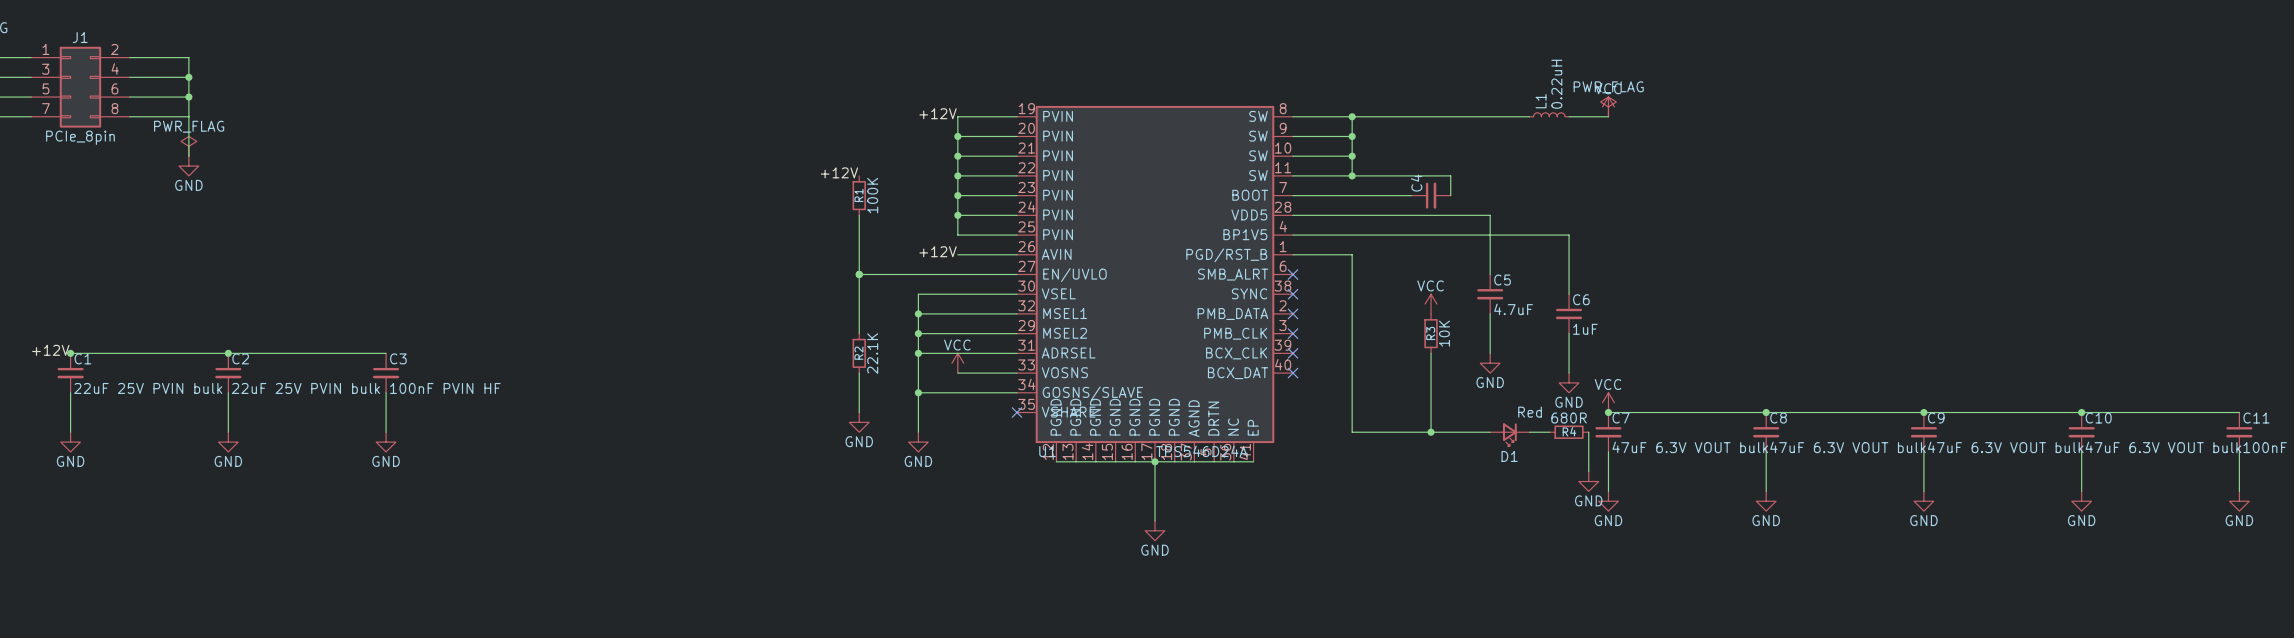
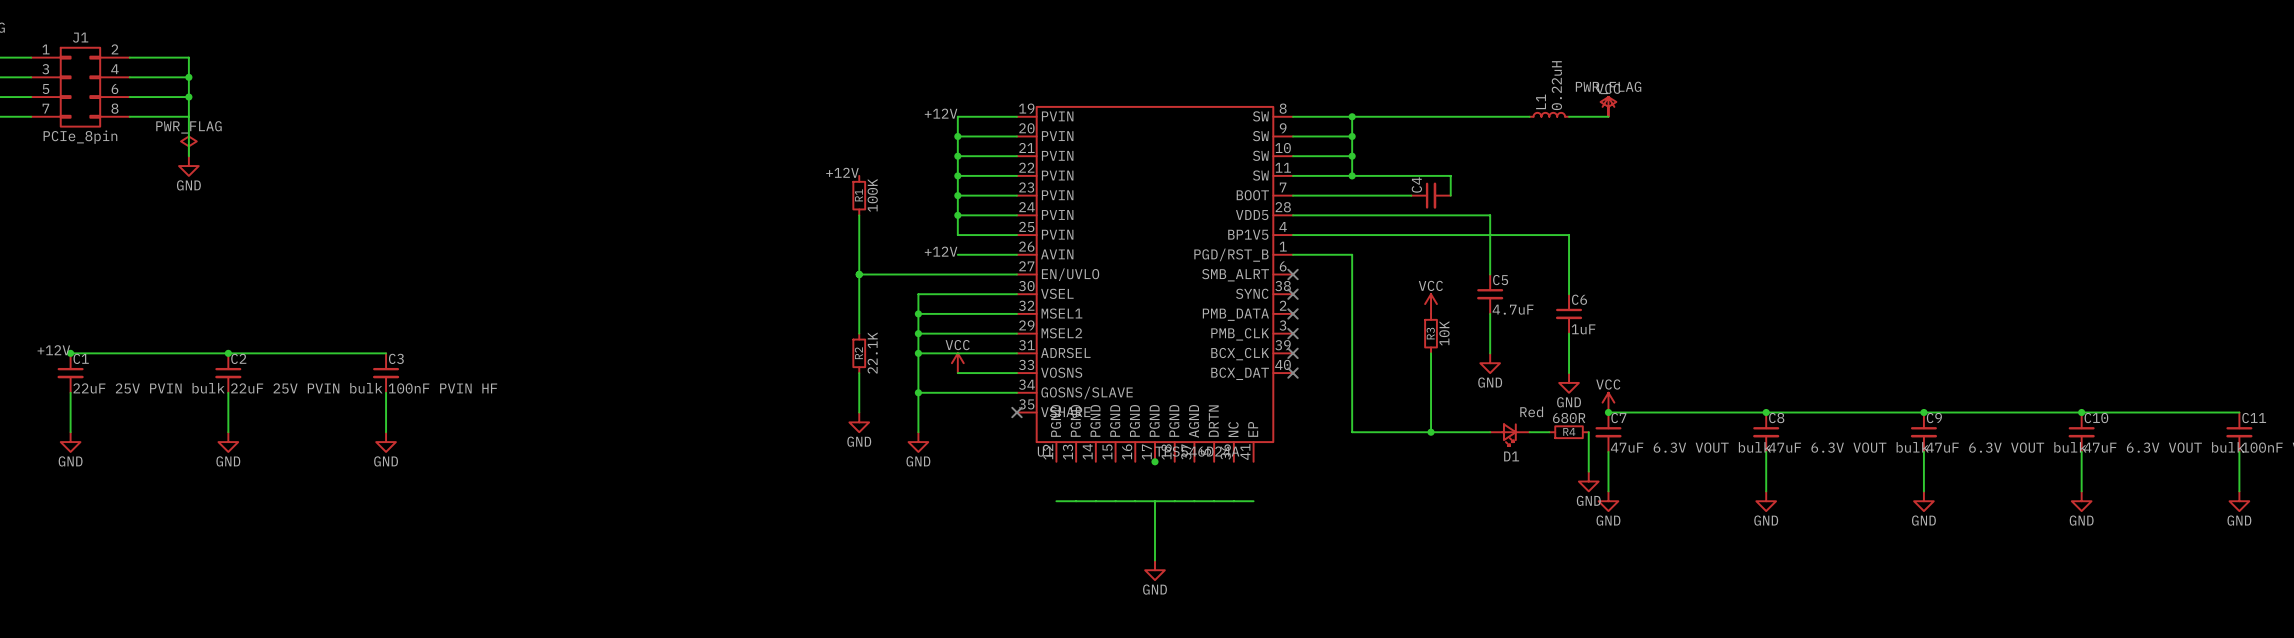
wire: (1056, 461) (1253, 461) -> (1056, 501) (1253, 501)
wire: (1154, 461) (1154, 501) -> (1154, 520) (1154, 560)
power symbol position: GND (1154, 530) -> GND (1154, 570)

